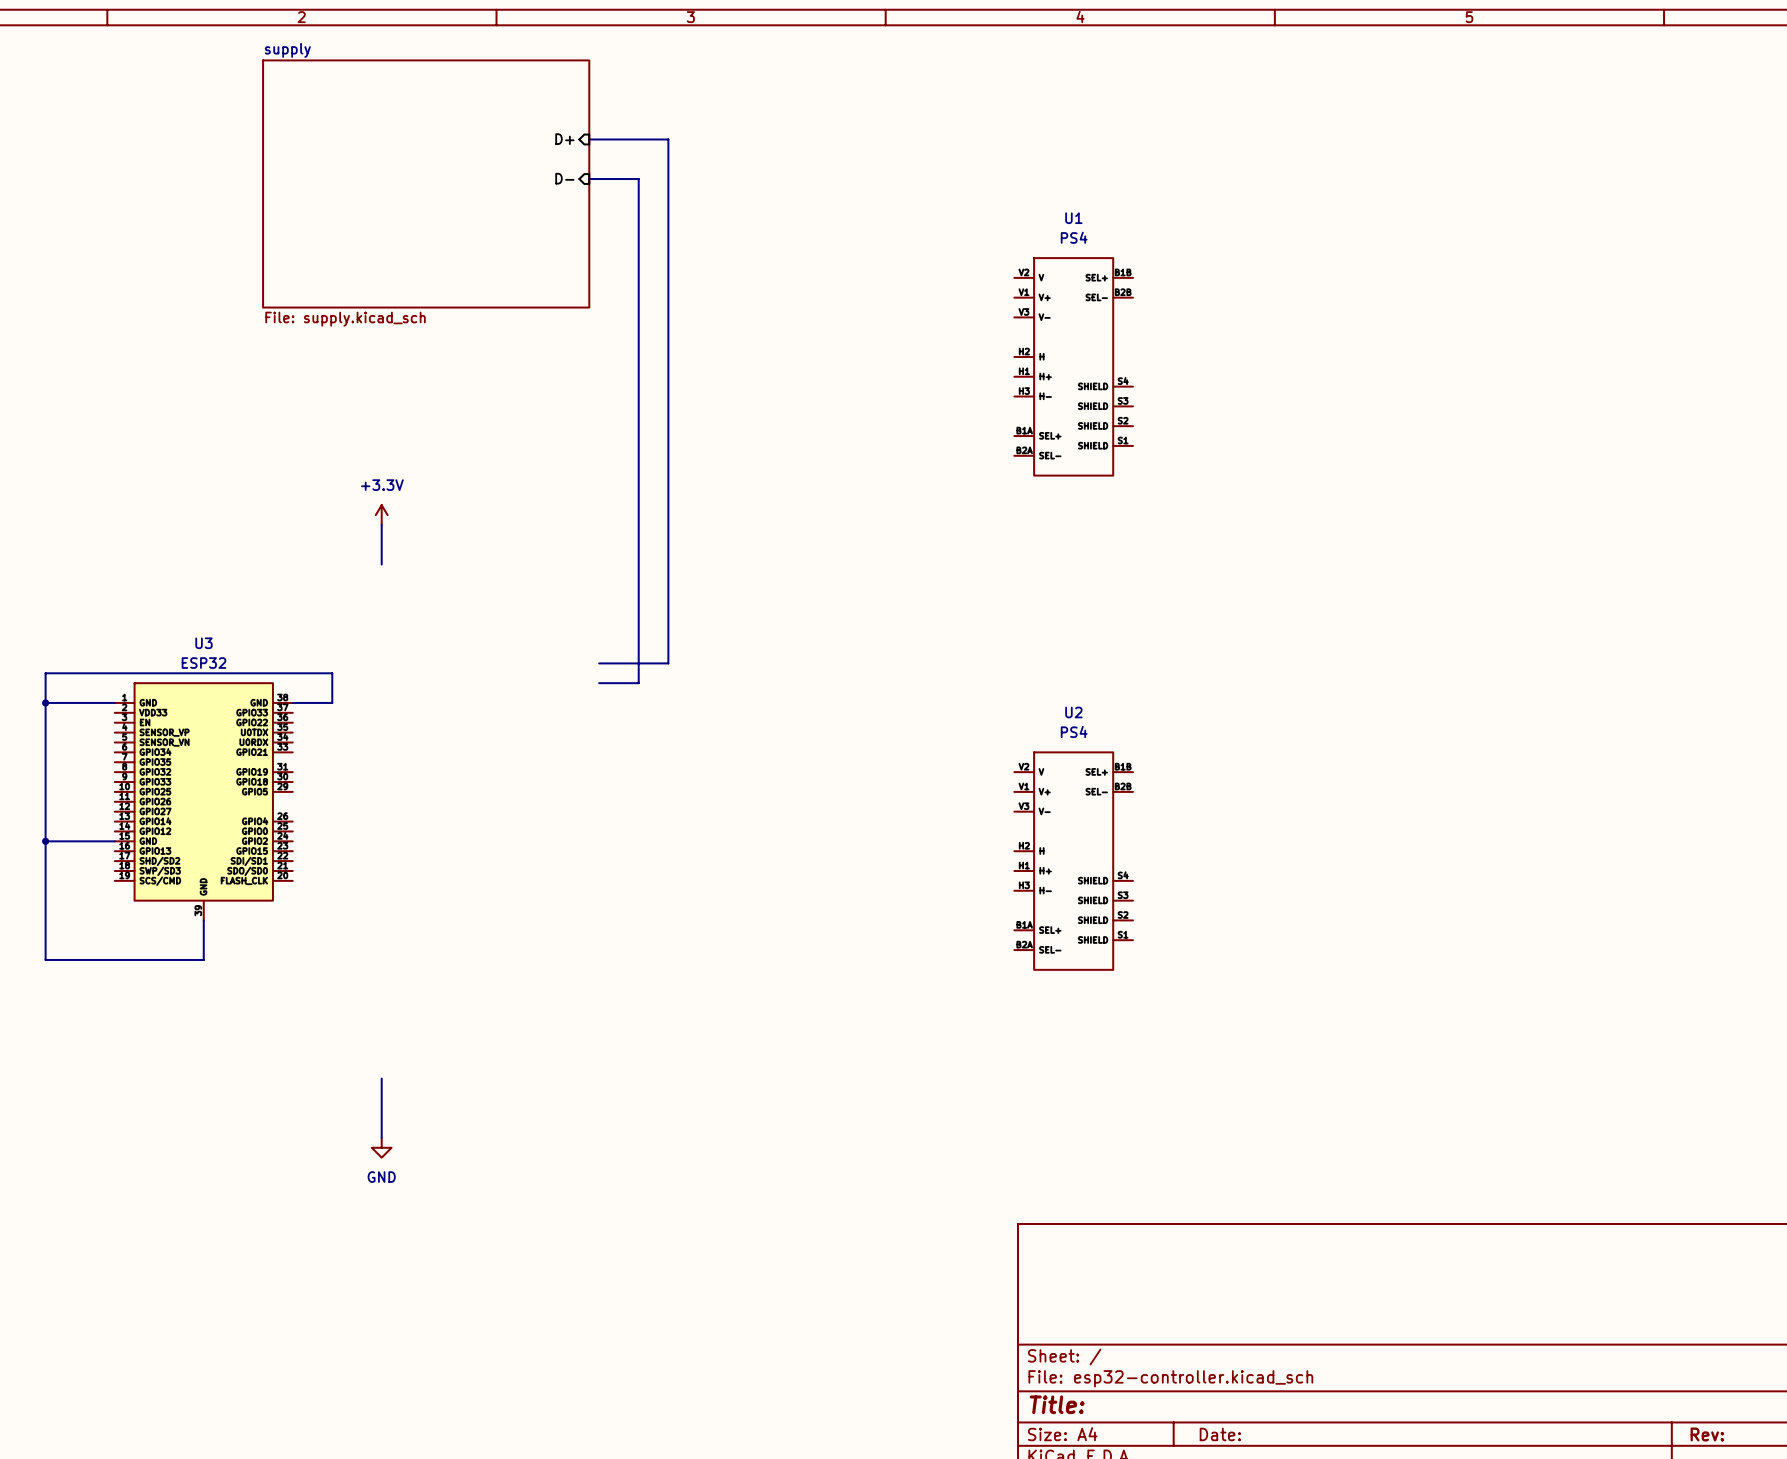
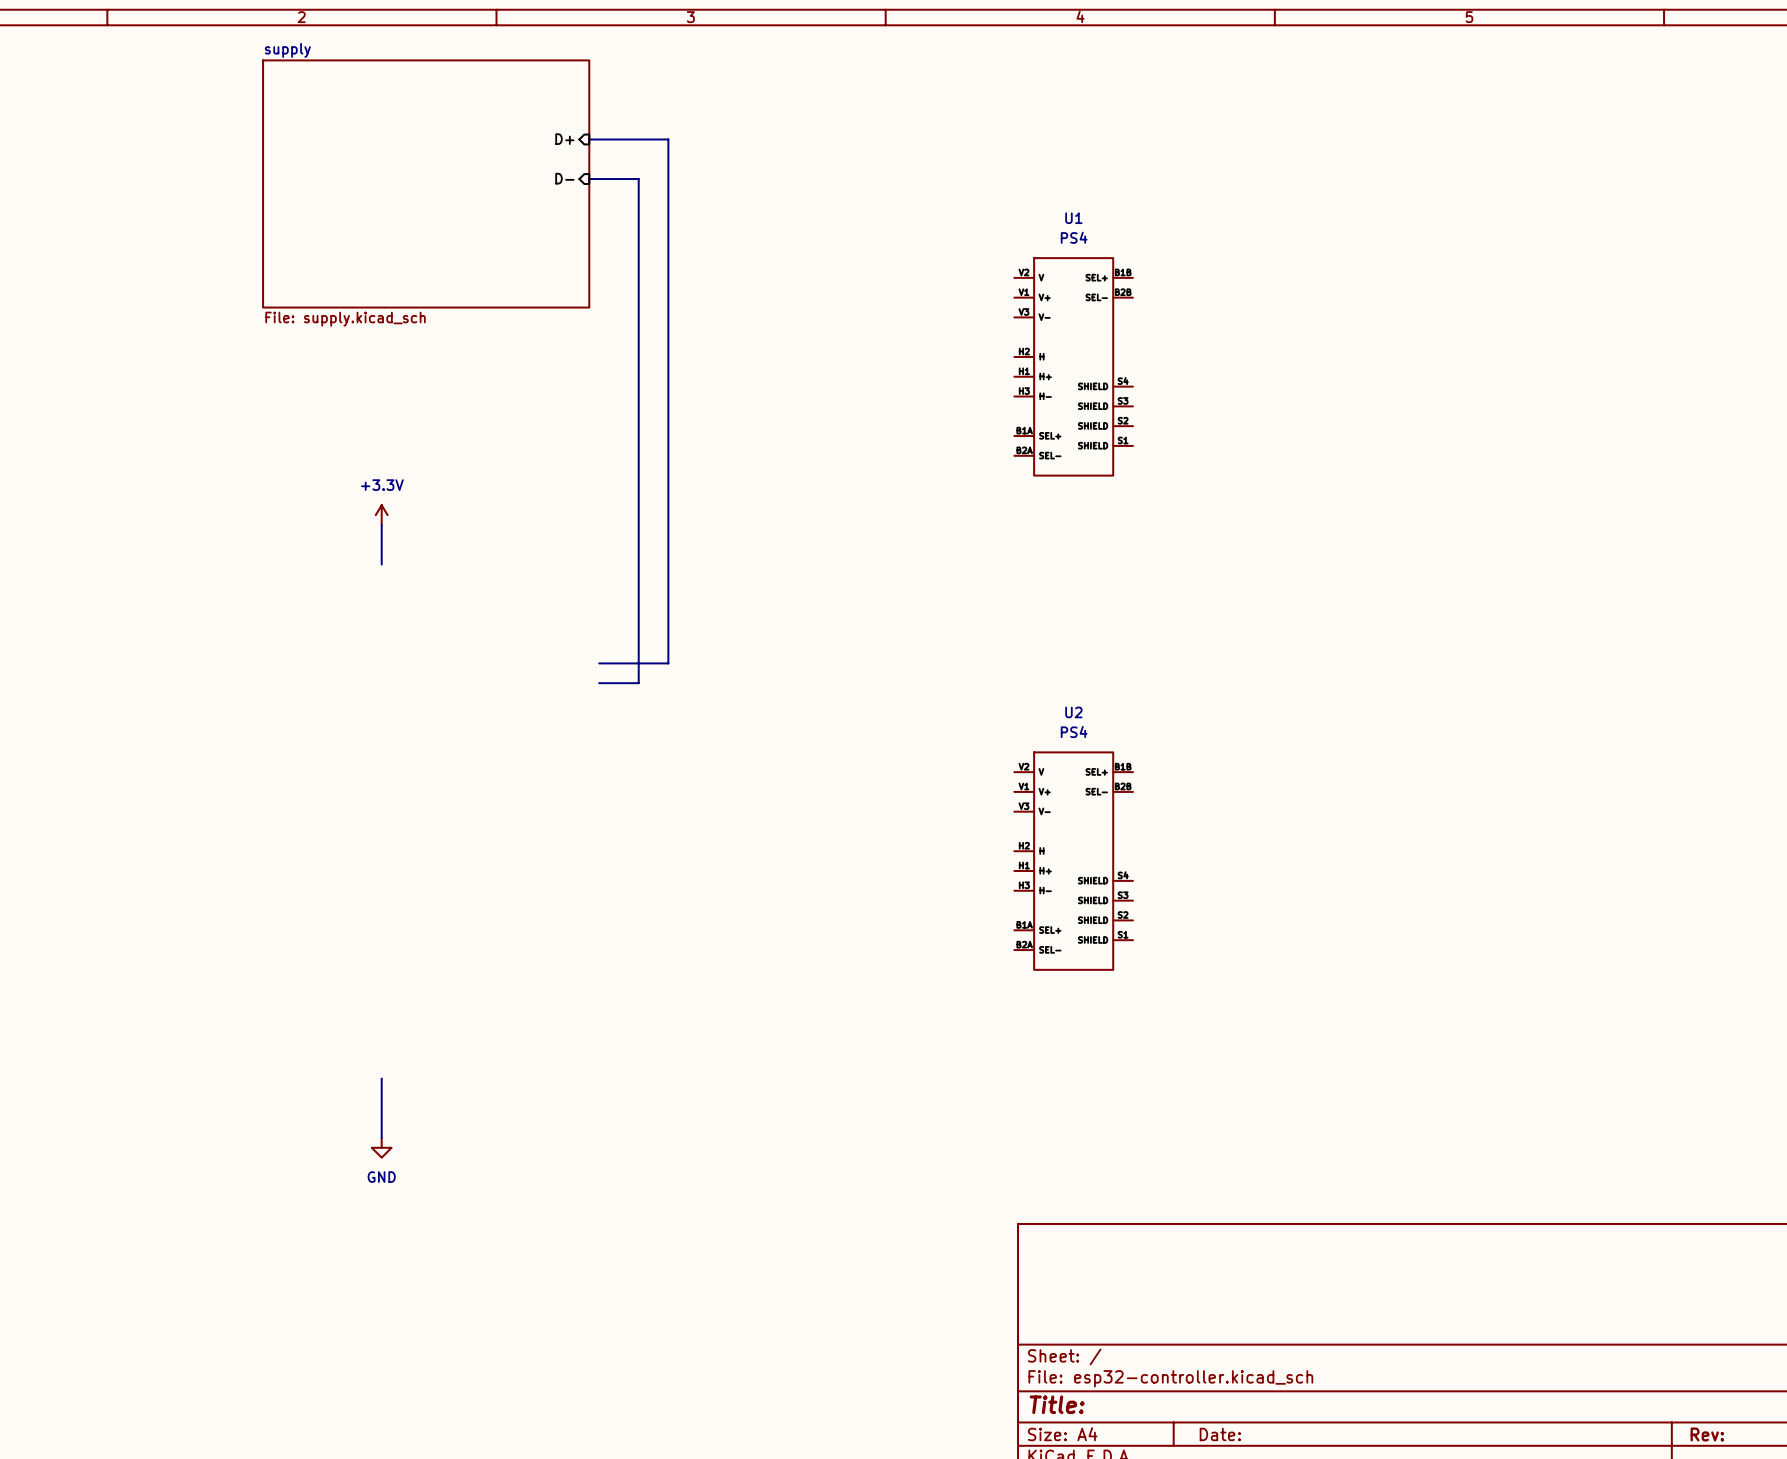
wire: (45, 702) (114, 702) -> none
junction: (45, 702) -> none
wire: (292, 702) (332, 702) (332, 673) (45, 673) (45, 959) (203, 959) (203, 920) -> none
U3: ESP32 (203, 801) -> none
wire: (45, 841) (114, 841) -> none
junction: (45, 841) -> none

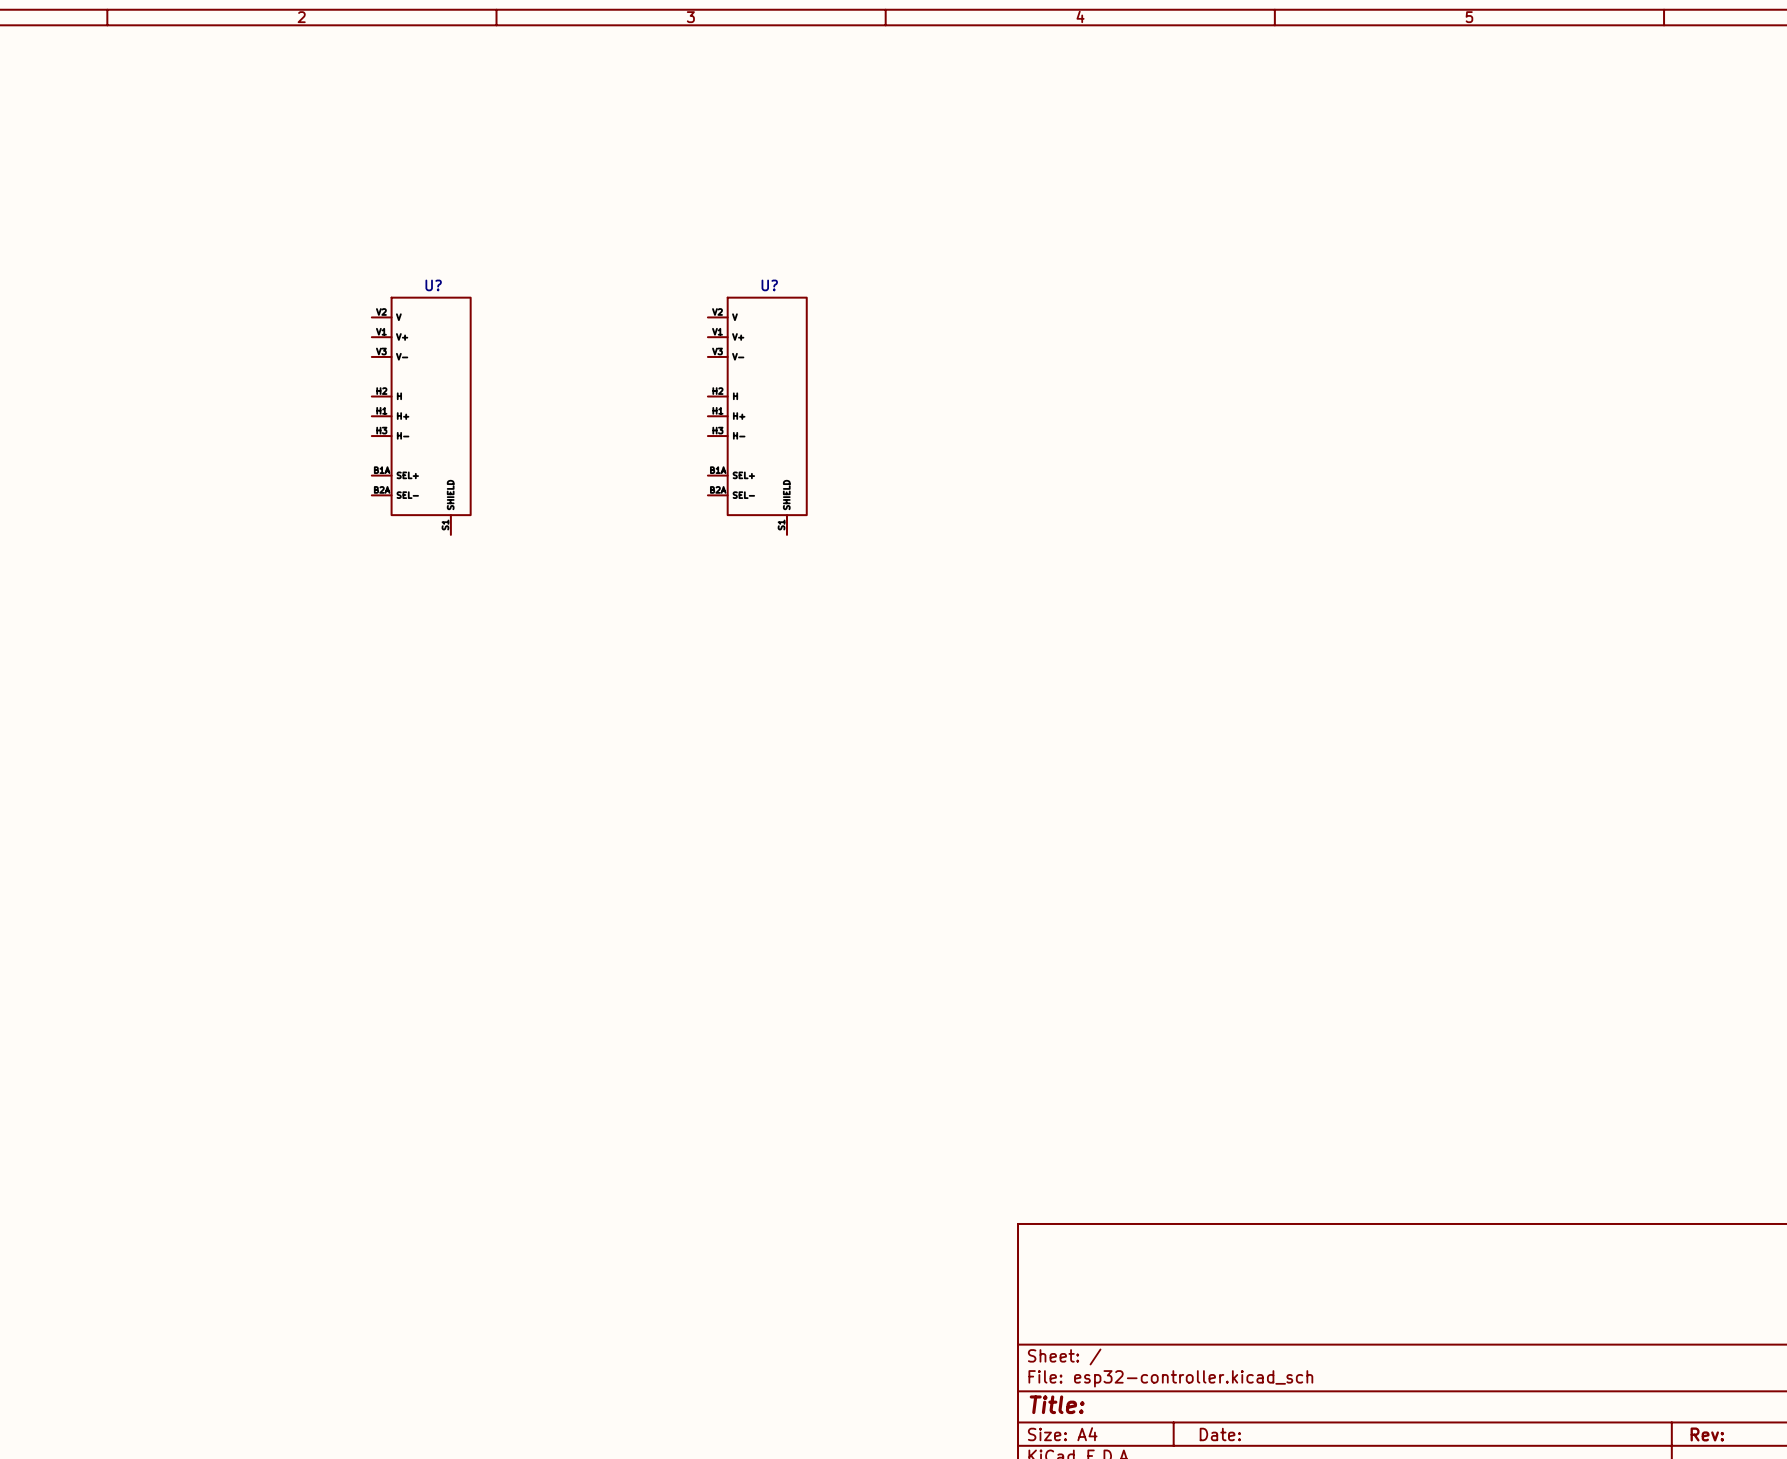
sheet pin: D+ (564, 139) -> none
wire: (589, 139) (668, 139) (668, 663) (599, 663) -> none
sheet pin: D- (564, 178) -> none
wire: (589, 179) (638, 179) (638, 683) (599, 683) -> none
sheet supply: File: supply.kicad_sch (426, 183) -> none
U1: PS4 (1073, 366) -> none
U?: none -> (421, 416)
U?: none -> (757, 416)
power symbol: +3.3V (381, 515) -> none
wire: (381, 525) (381, 564) -> none
U2: PS4 (1073, 861) -> none
wire: (381, 1078) (381, 1137) -> none
power symbol: GND (381, 1147) -> none

